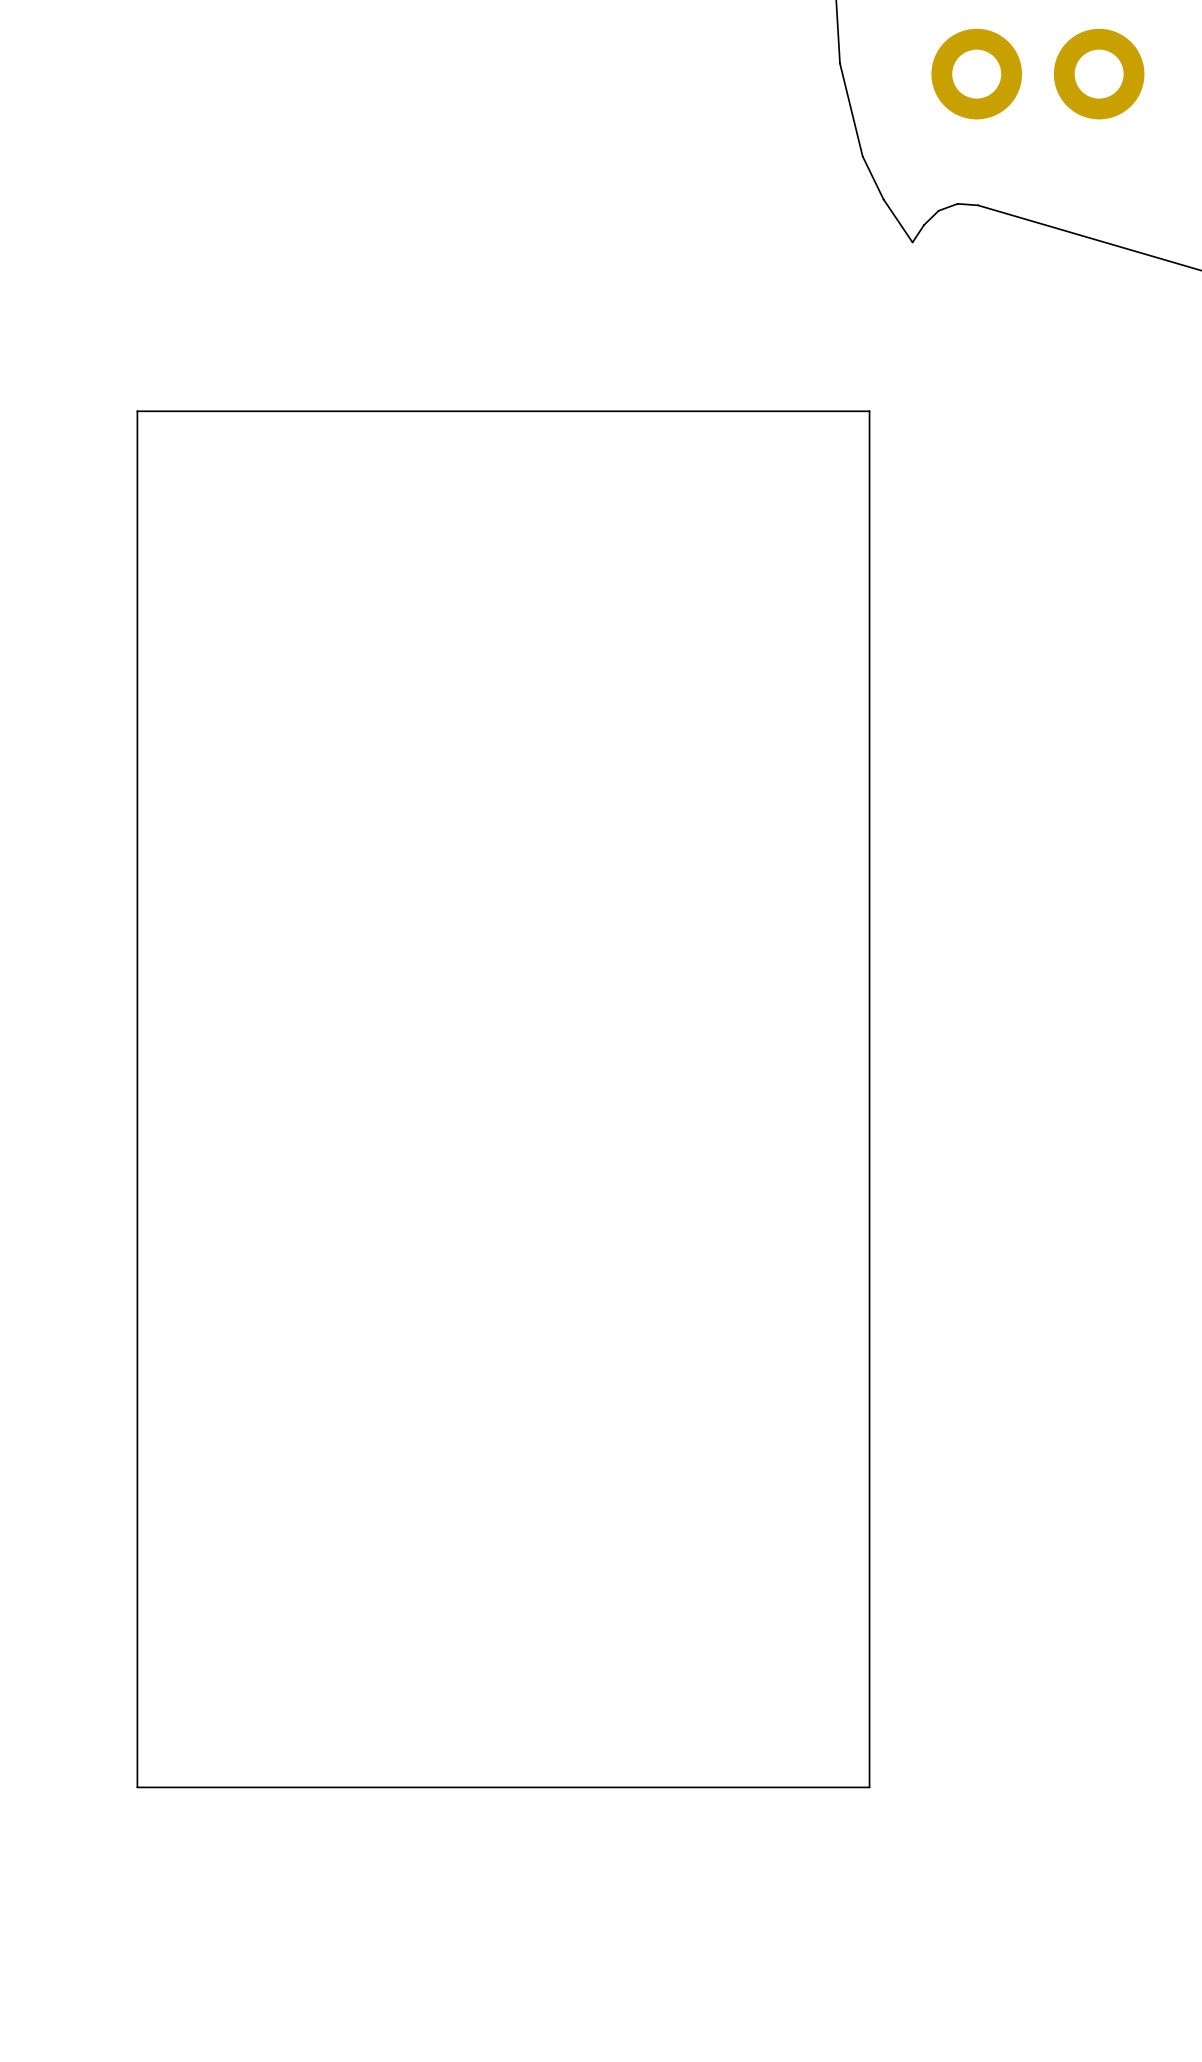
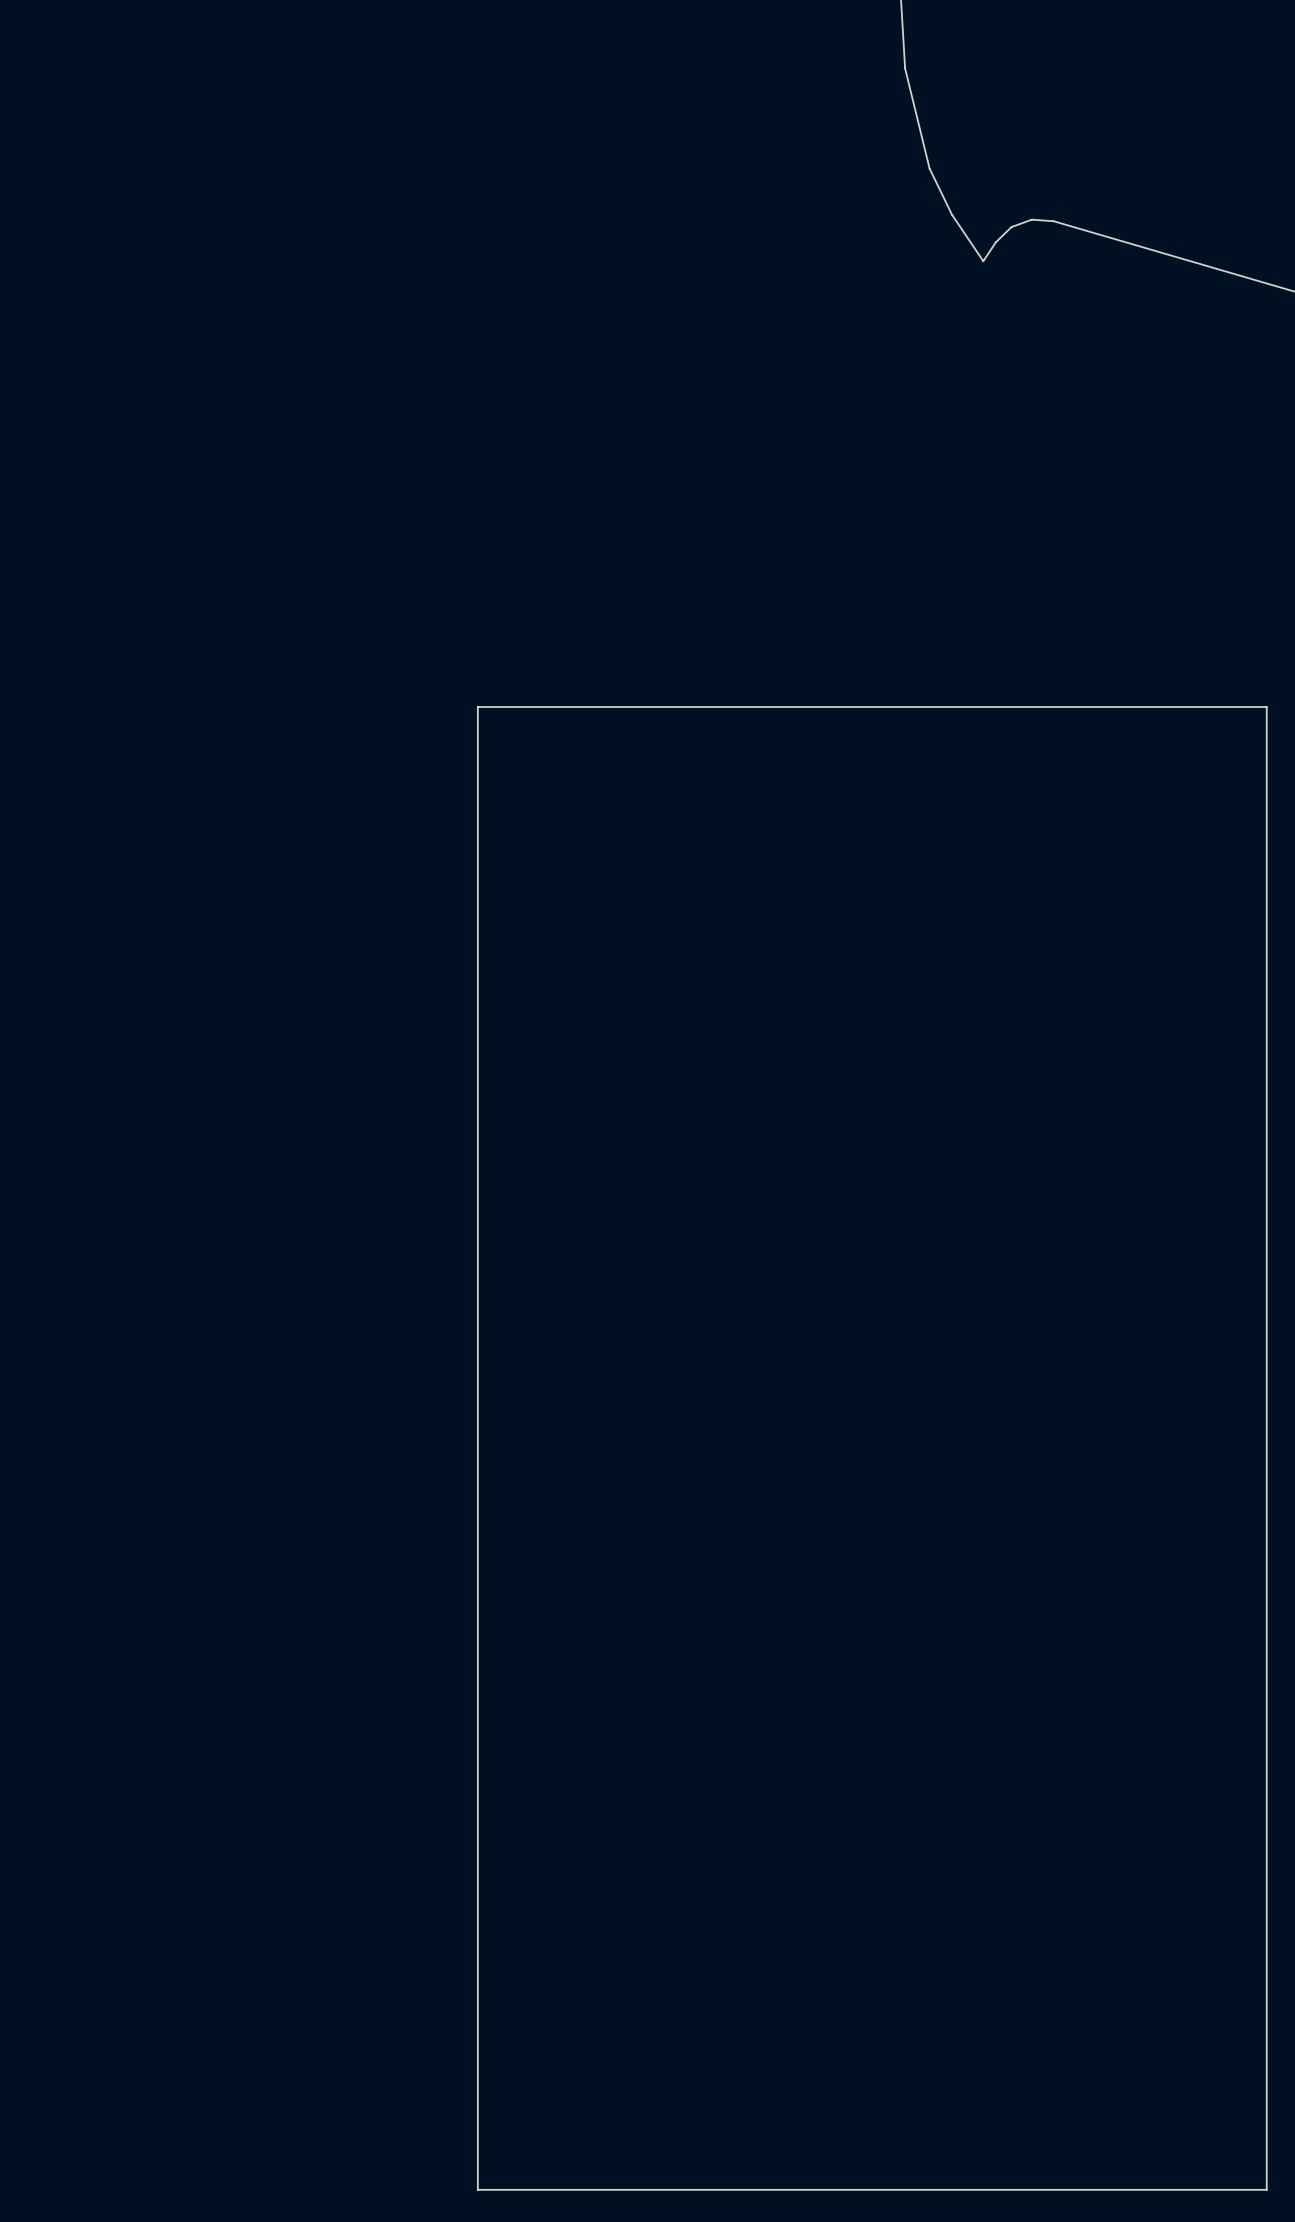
part: (1037, 74) -> none
board edge: (869, 411) (137, 411) (137, 1787) (869, 1787) (869, 411) -> (1266, 707) (477, 707) (477, 2189) (1266, 2189) (1266, 707)

